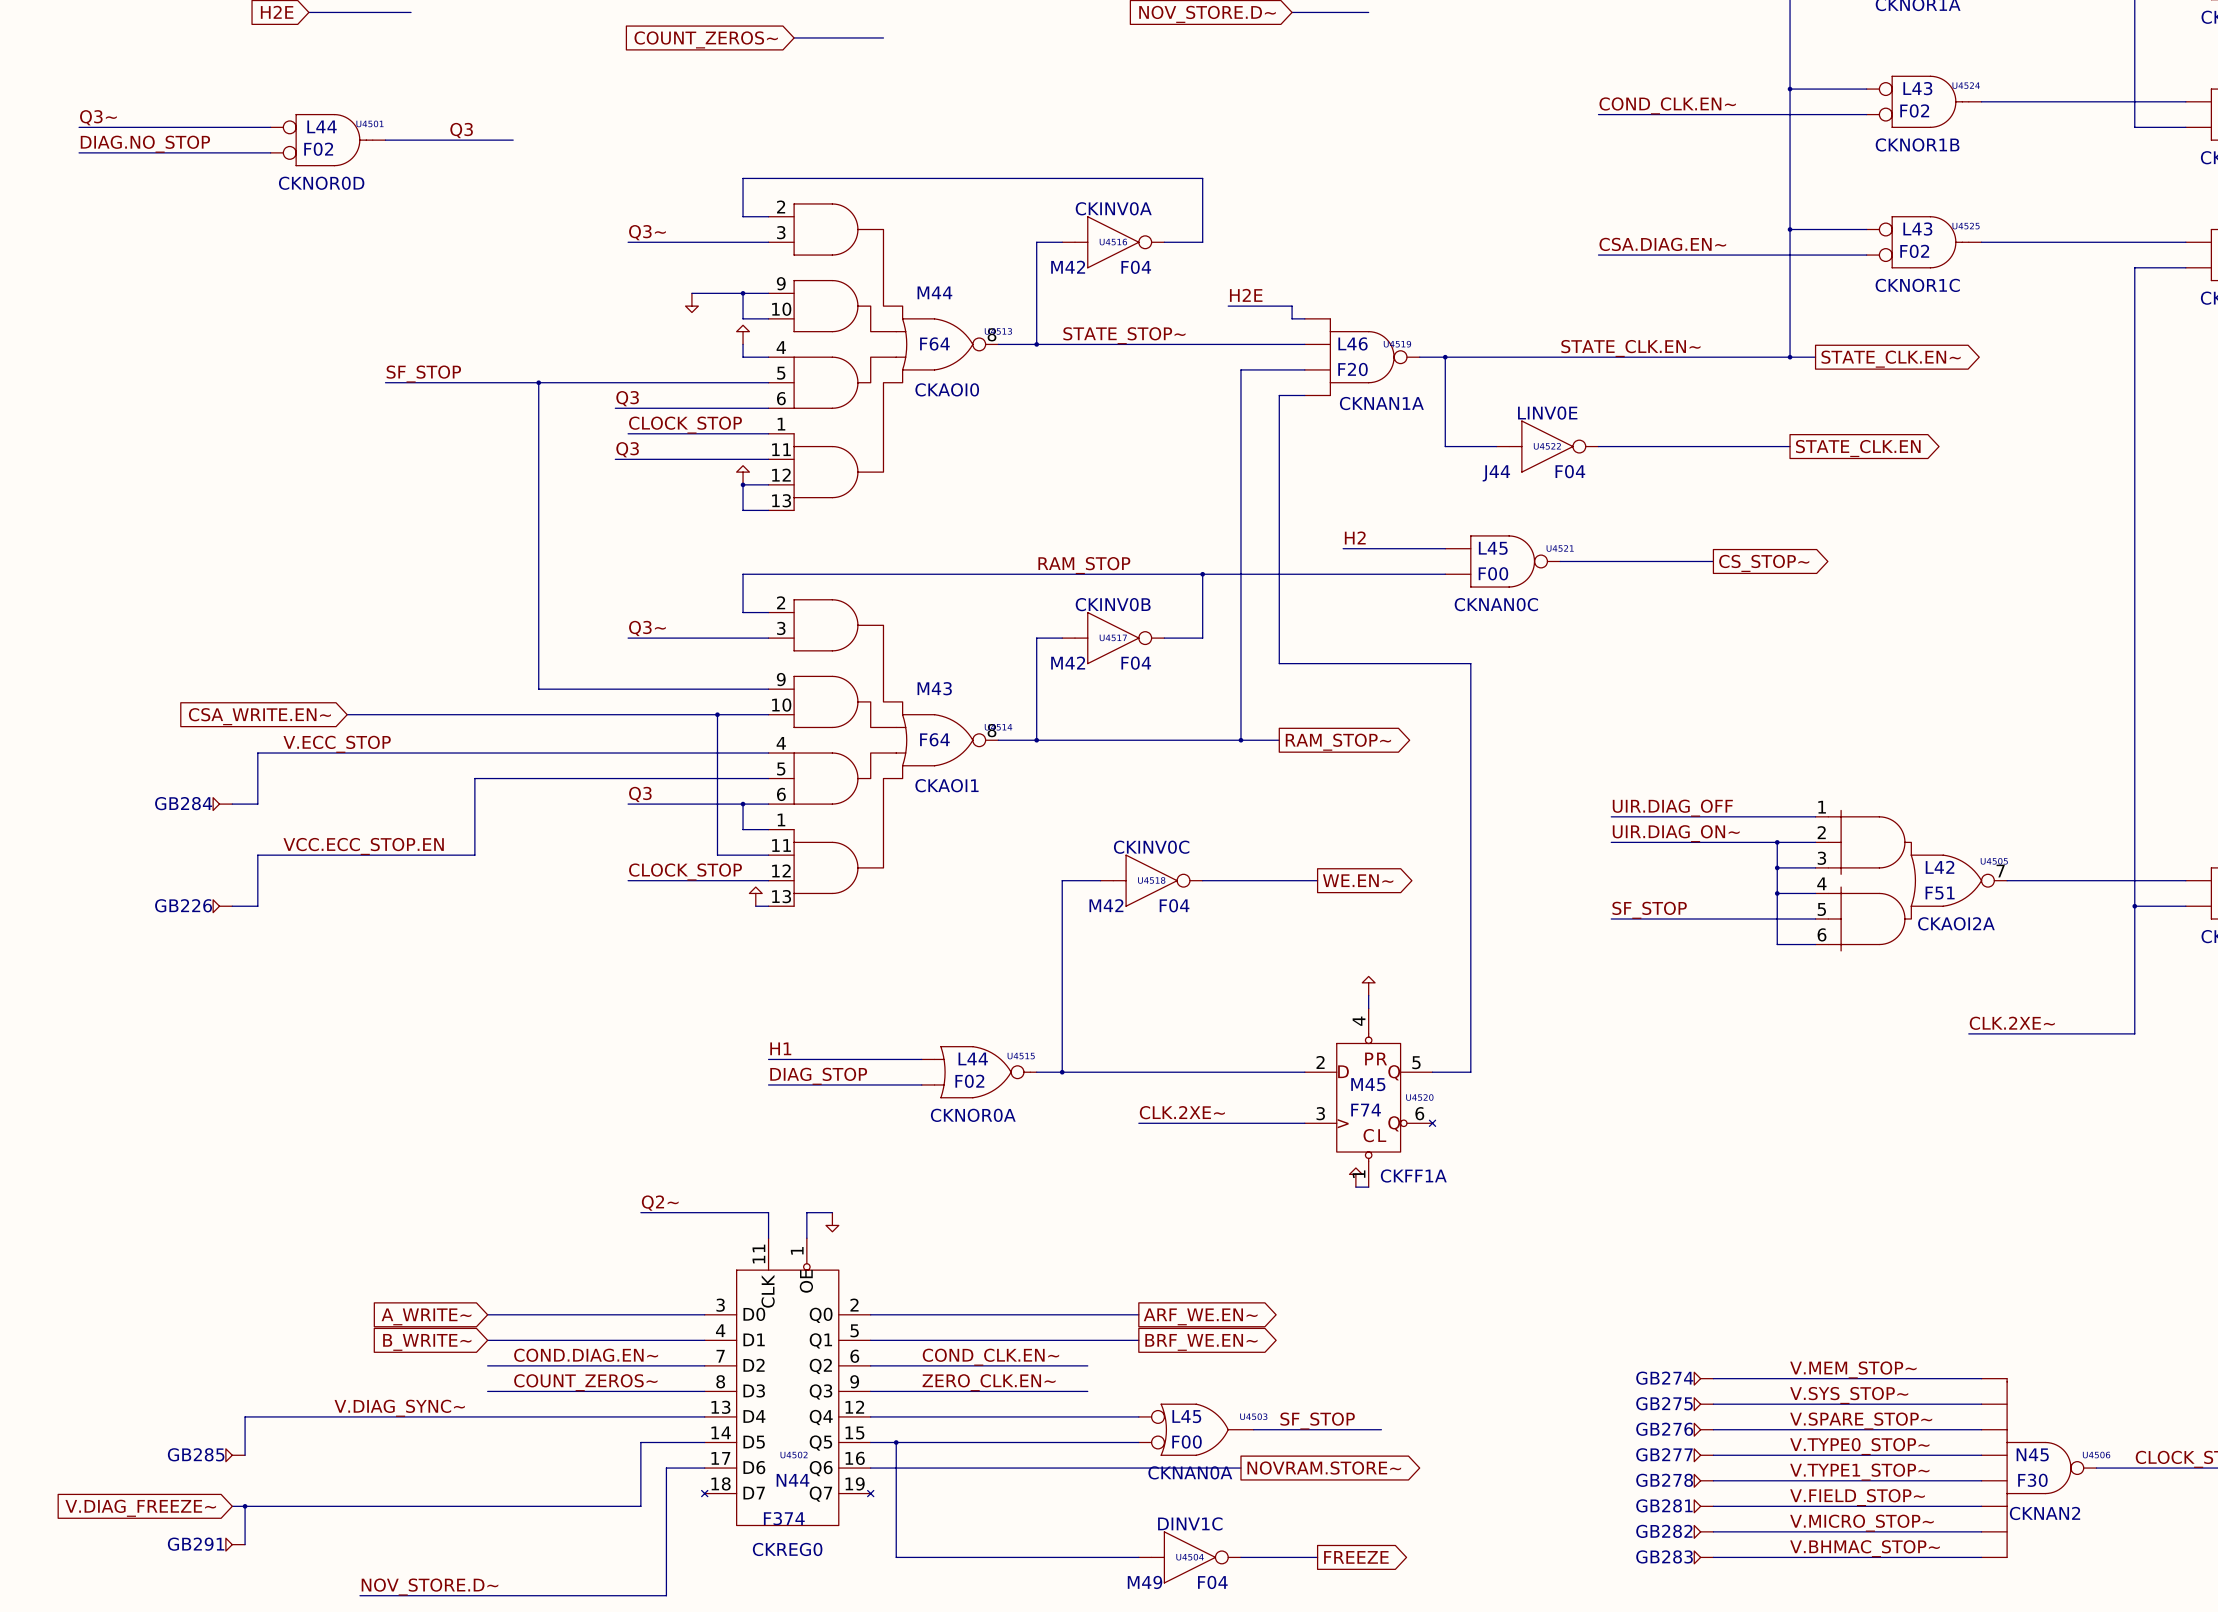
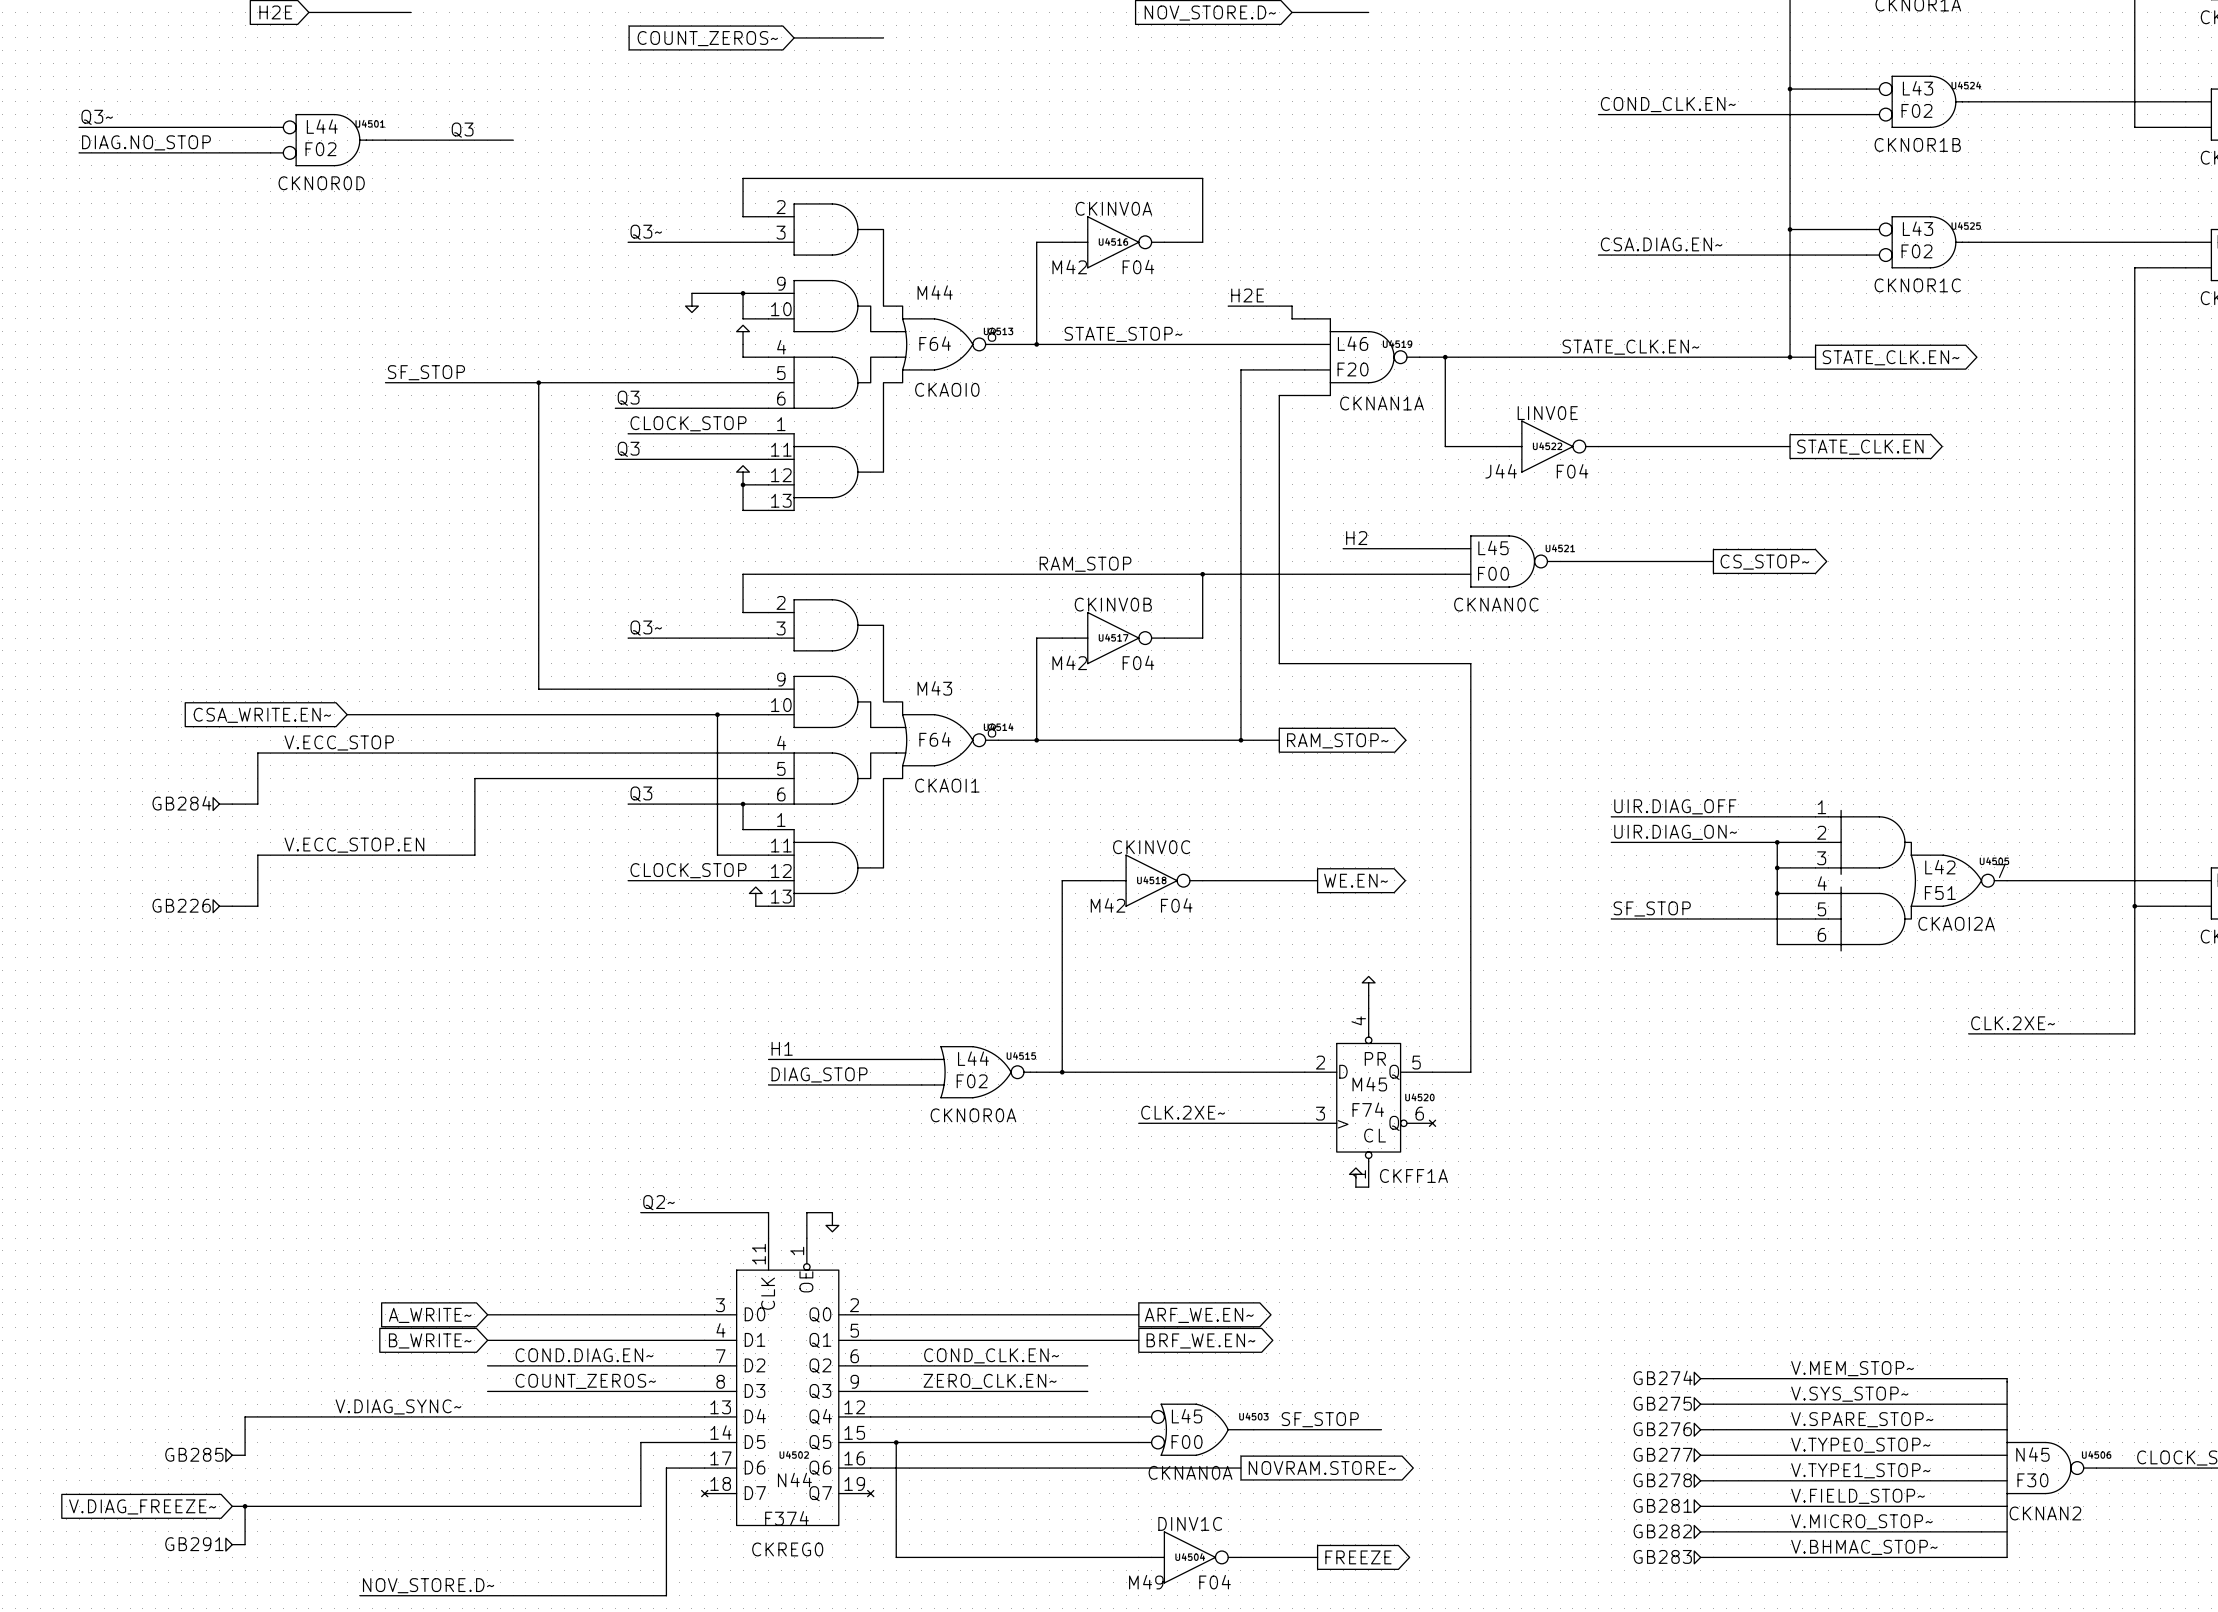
label: VCC.ECC_STOP.EN (363, 846) -> V.ECC_STOP.EN (354, 845)

